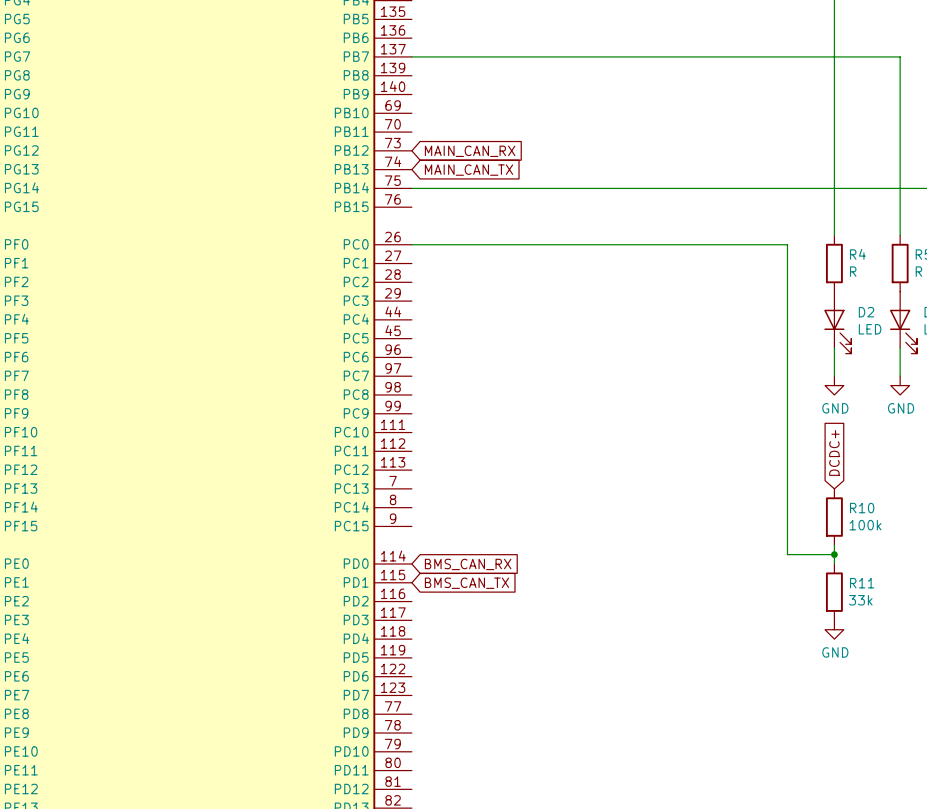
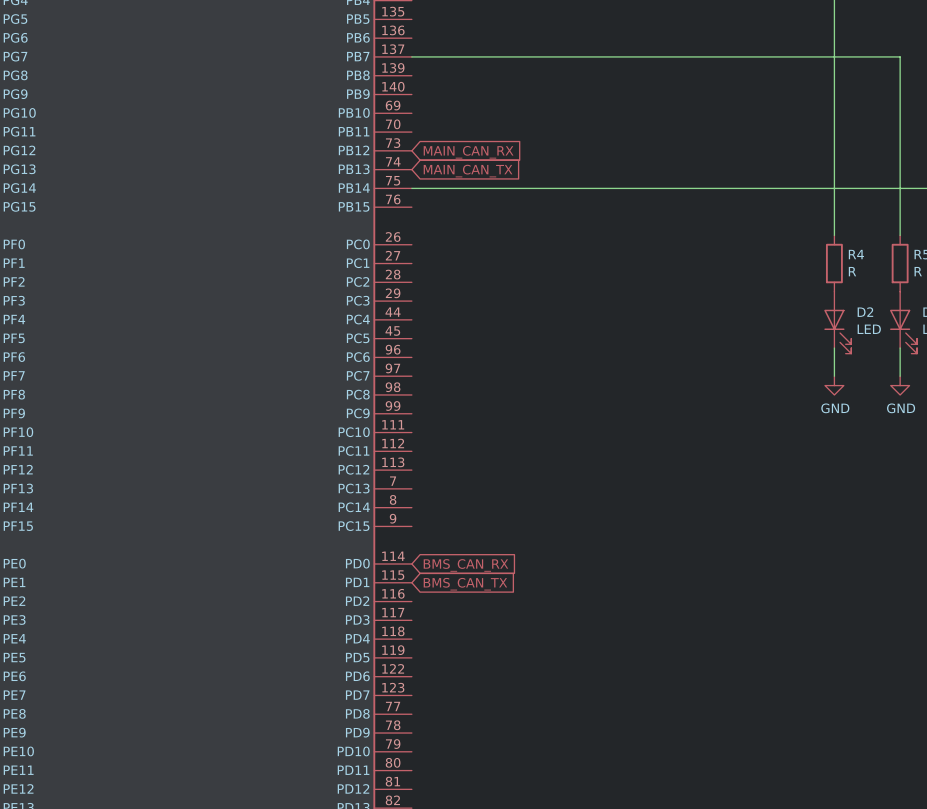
wire: (411, 244) (787, 244) (787, 554) (834, 554) -> none
global label: DCDC+ (834, 452) -> none
R10: 100k (834, 517) -> none
wire: (834, 545) (834, 564) -> none
junction: (834, 554) -> none
R11: 33k (834, 592) -> none
power symbol: GND (834, 629) -> none

